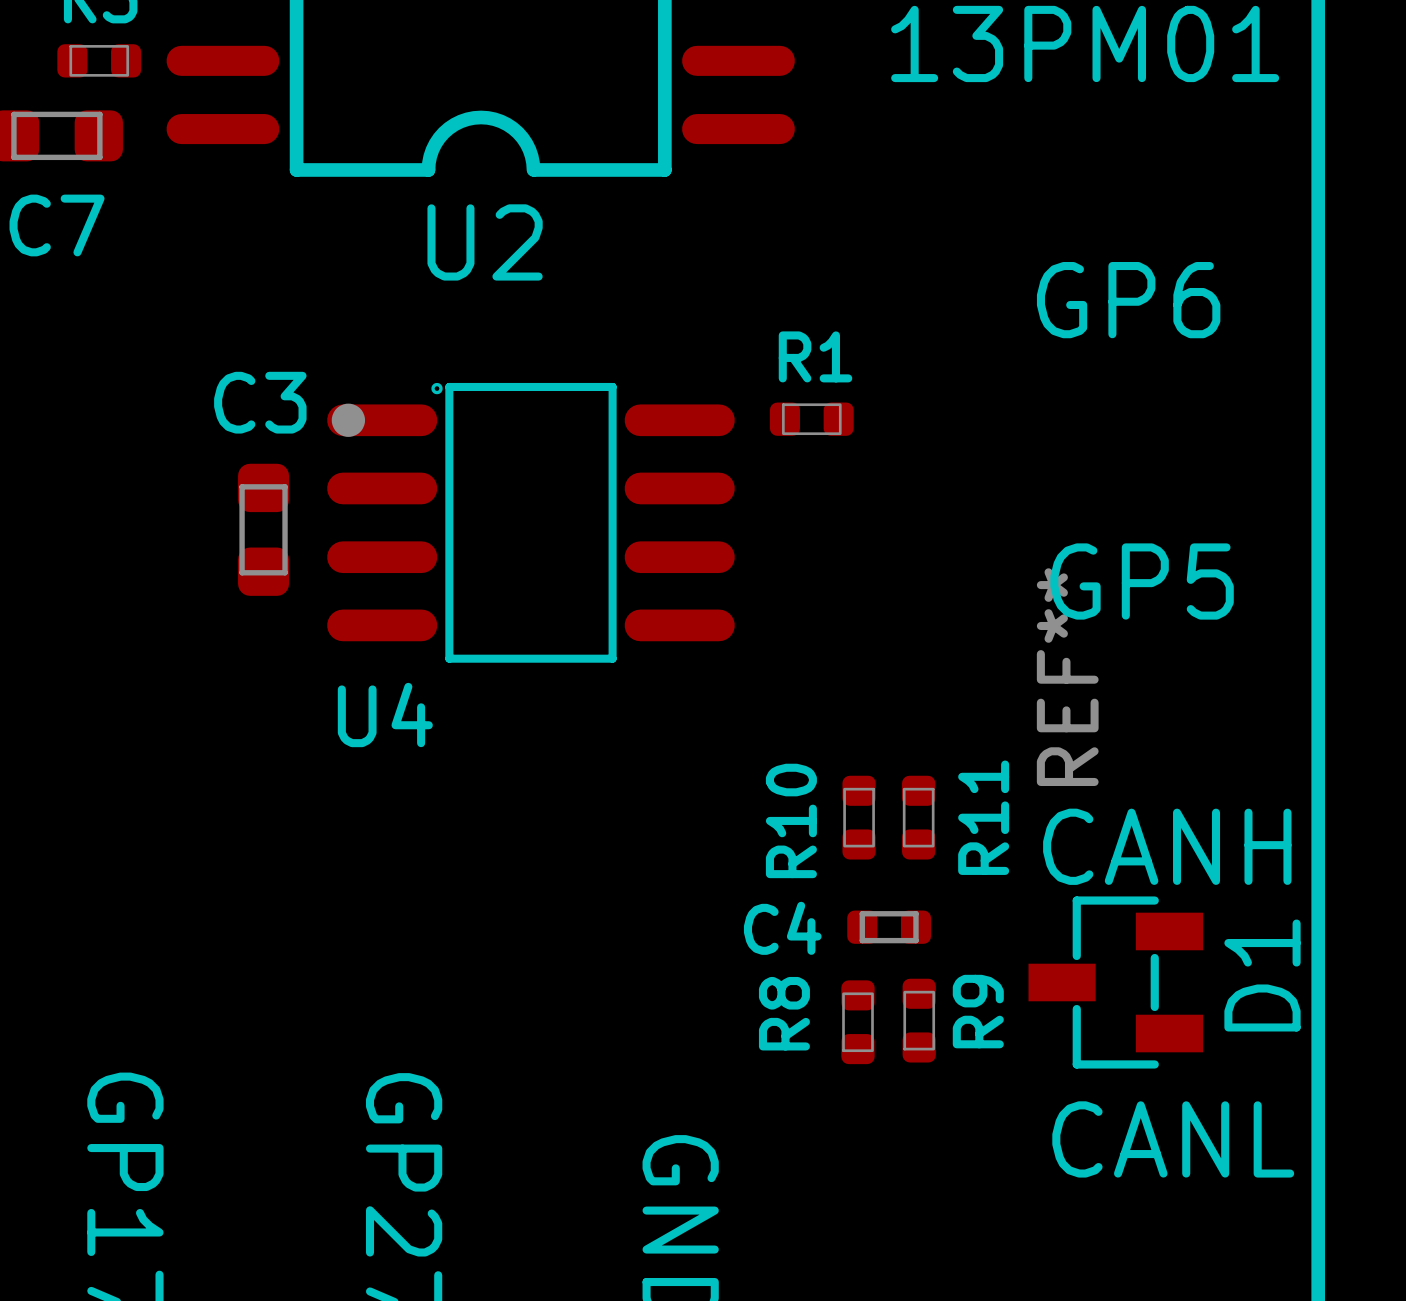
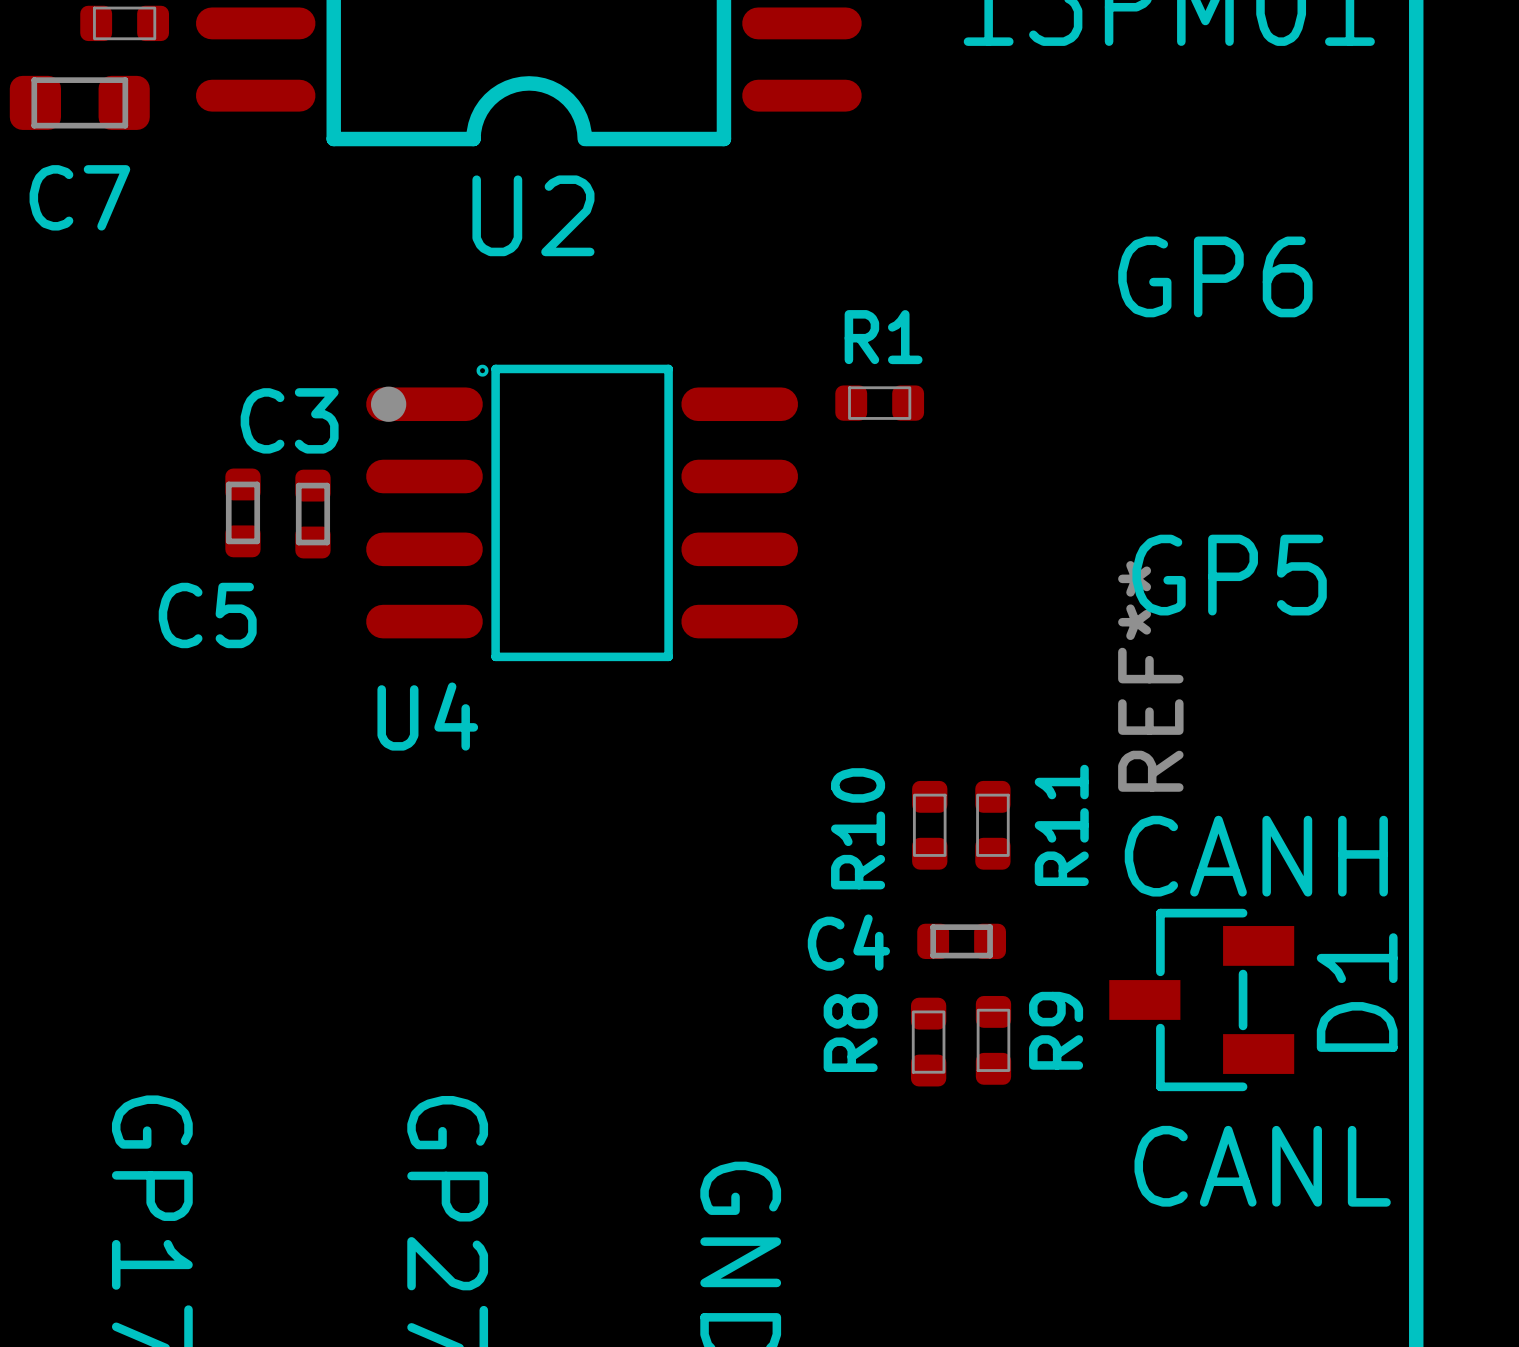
C3 name position: C3 (260, 402) -> C3 (289, 420)
C3 footprint: [238, 463, 290, 596] -> [295, 469, 331, 559]
C5: none -> (242, 512)

